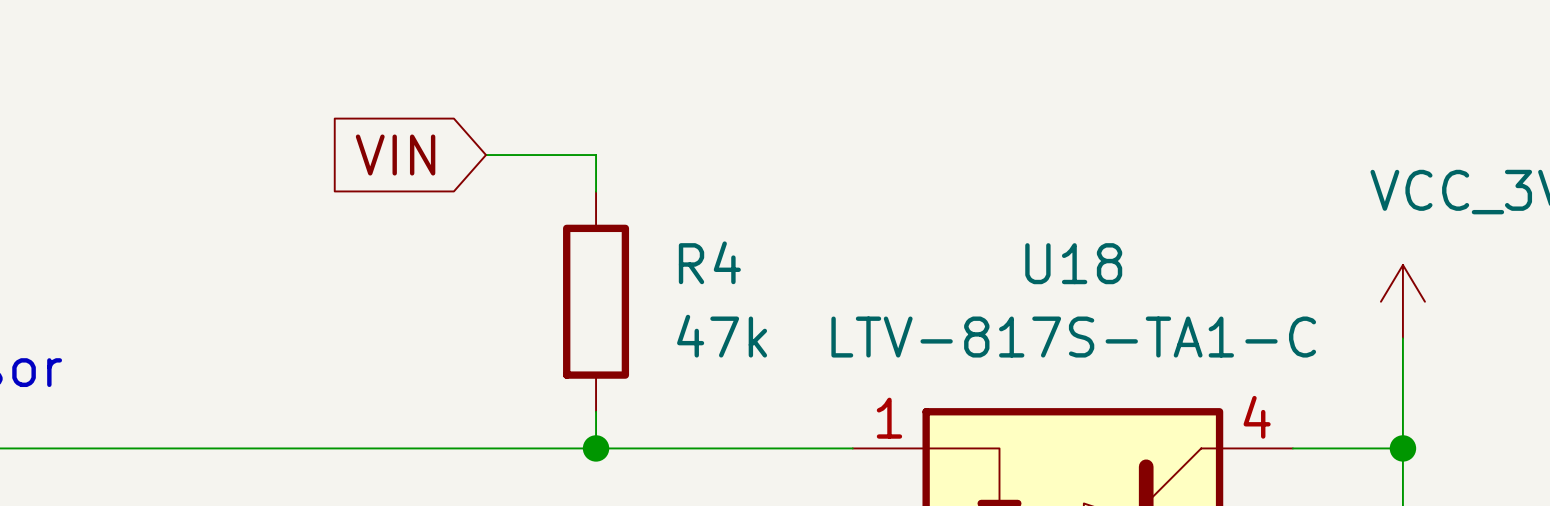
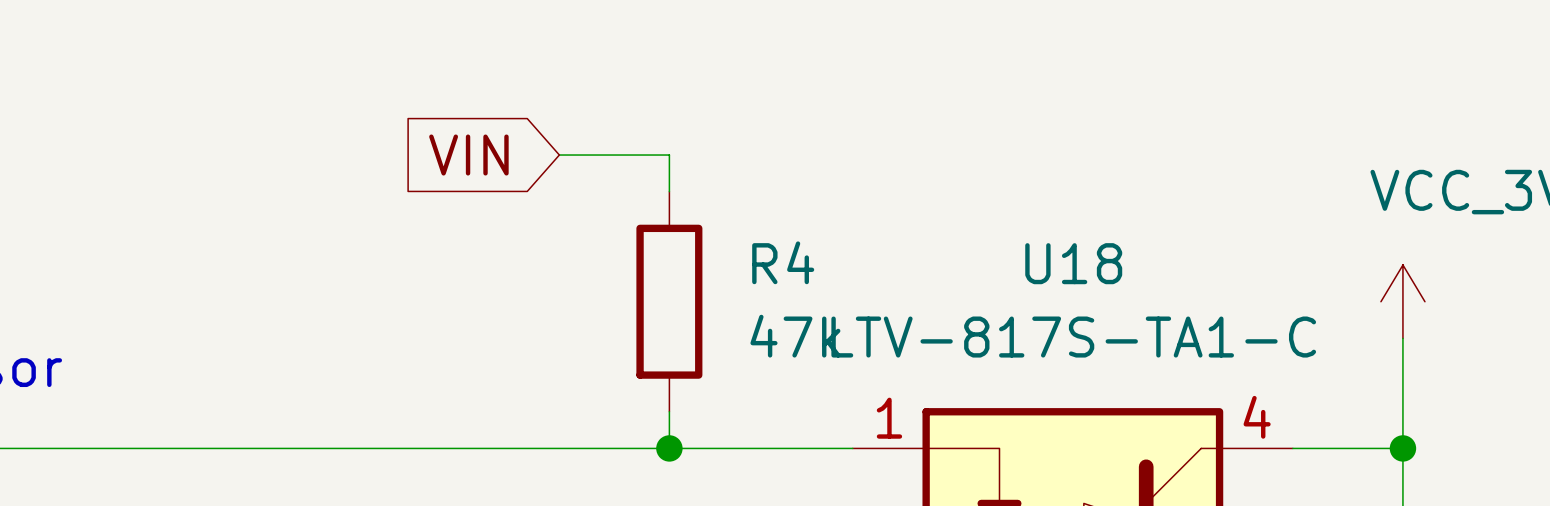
global label position: VIN (395, 155) -> VIN (468, 155)
wire: (486, 155) (559, 155) -> none
wire: (596, 155) (596, 191) -> (596, 155) (669, 155) (669, 191)
R4 position: (596, 301) -> (669, 301)
wire: (596, 411) (596, 448) -> (669, 411) (669, 448)
junction position: (596, 448) -> (669, 448)

